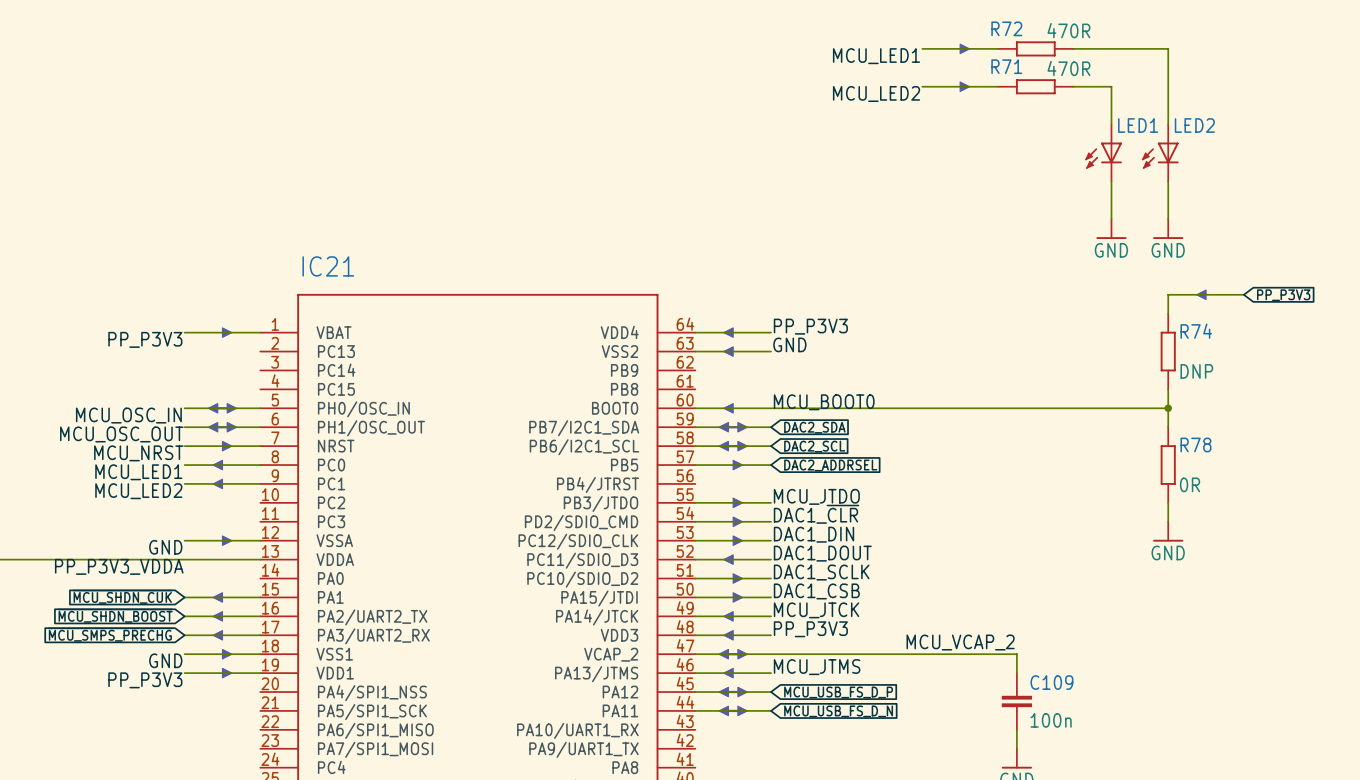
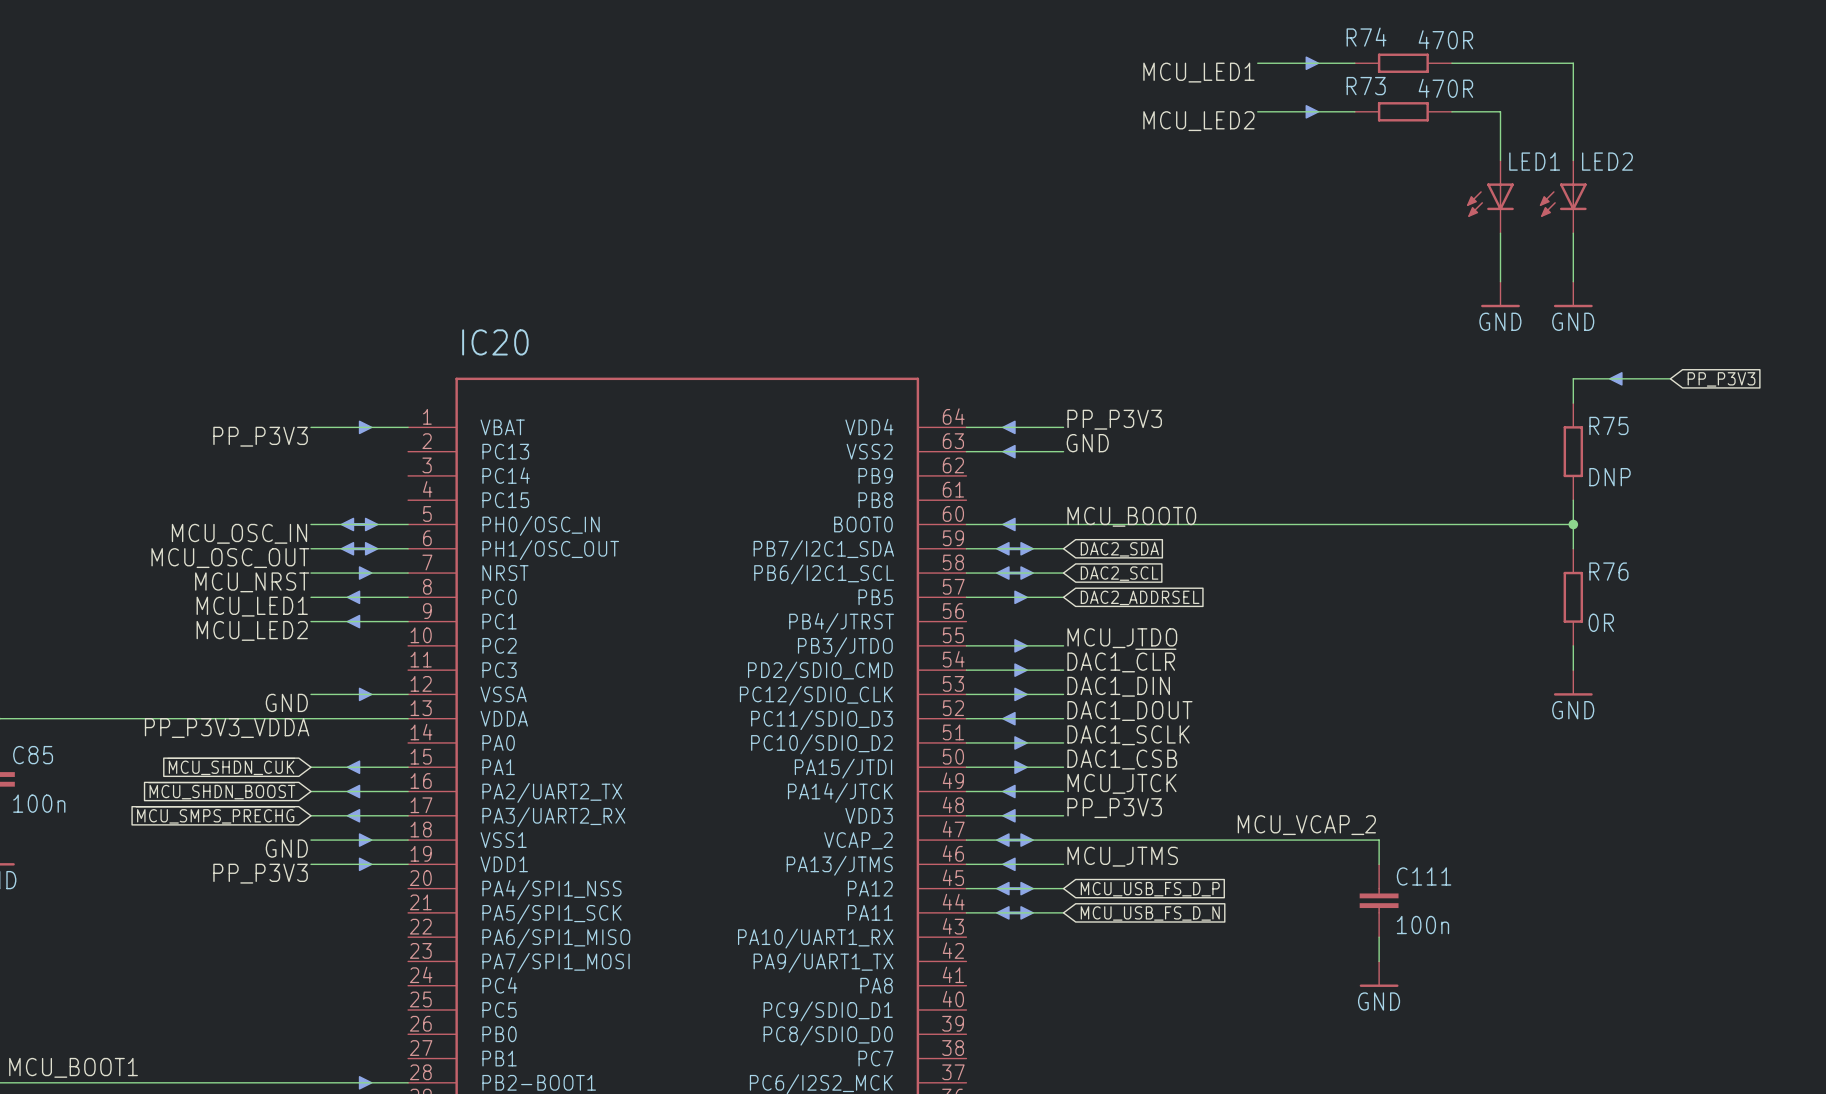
R72 name: R72 (1006, 28) -> R74 (1366, 37)
R71 name: R71 (1006, 66) -> R73 (1366, 86)
IC21 name: IC21 (328, 266) -> IC20 (495, 342)
R74 name: R74 (1196, 331) -> R75 (1608, 425)
R78 name: R78 (1195, 444) -> R76 (1608, 571)
C109 name: C109 (1051, 682) -> C111 (1424, 876)

